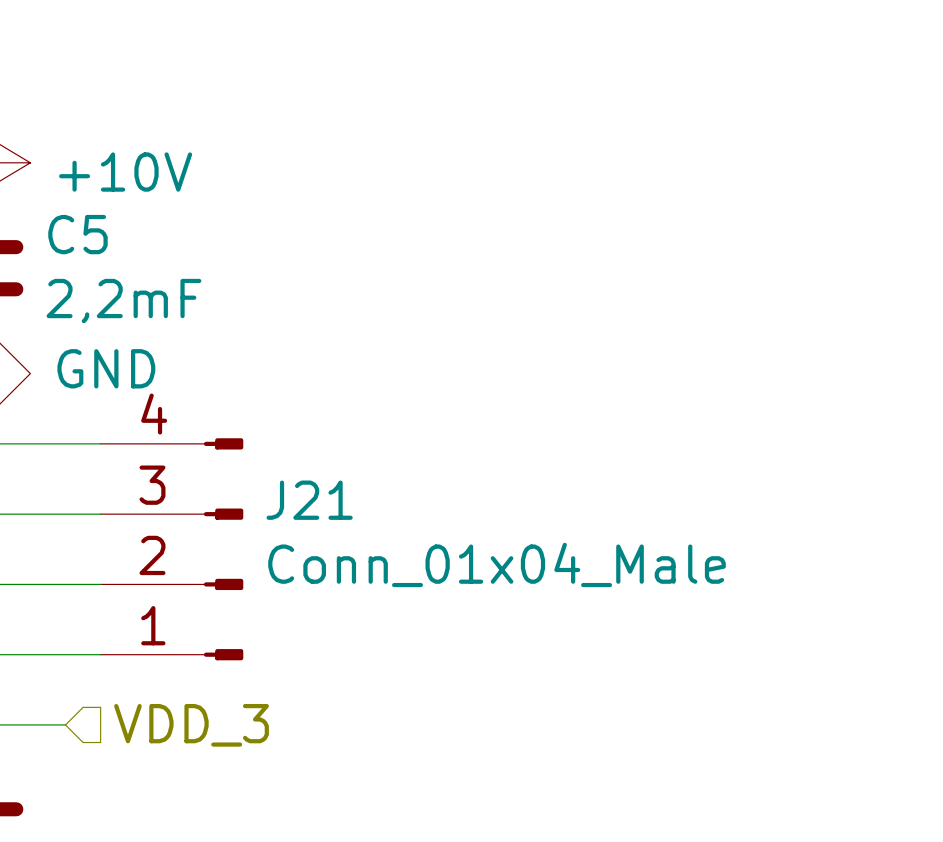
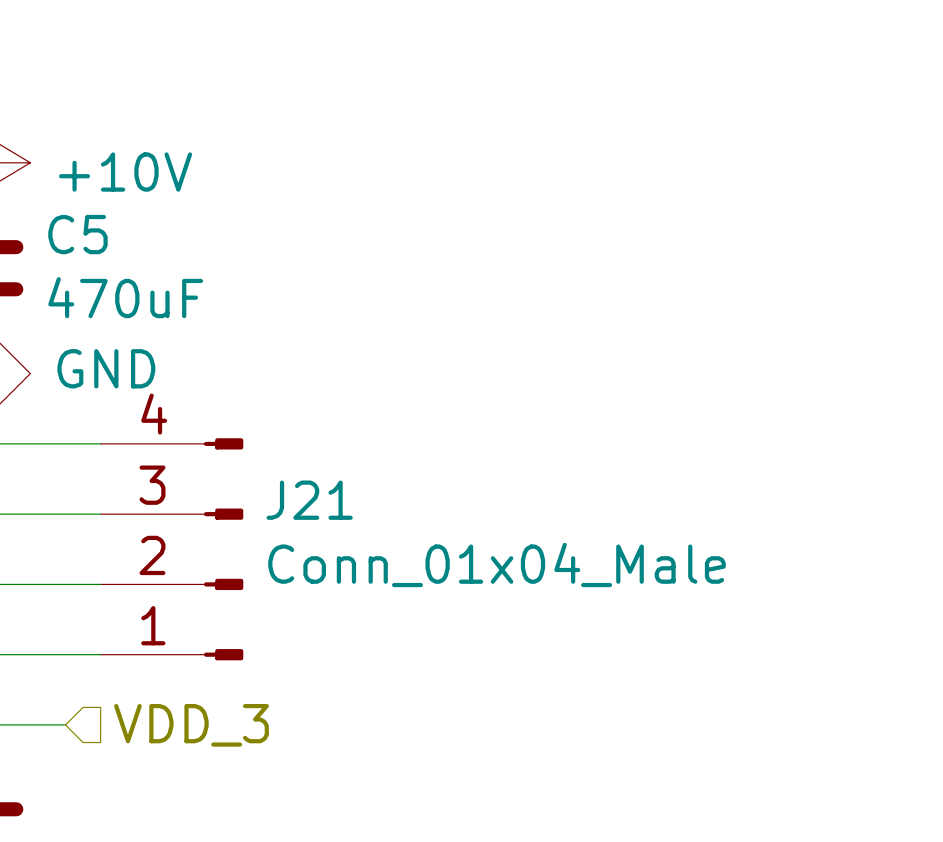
C5 value: 2,2mF (123, 301) -> 470uF (125, 297)

